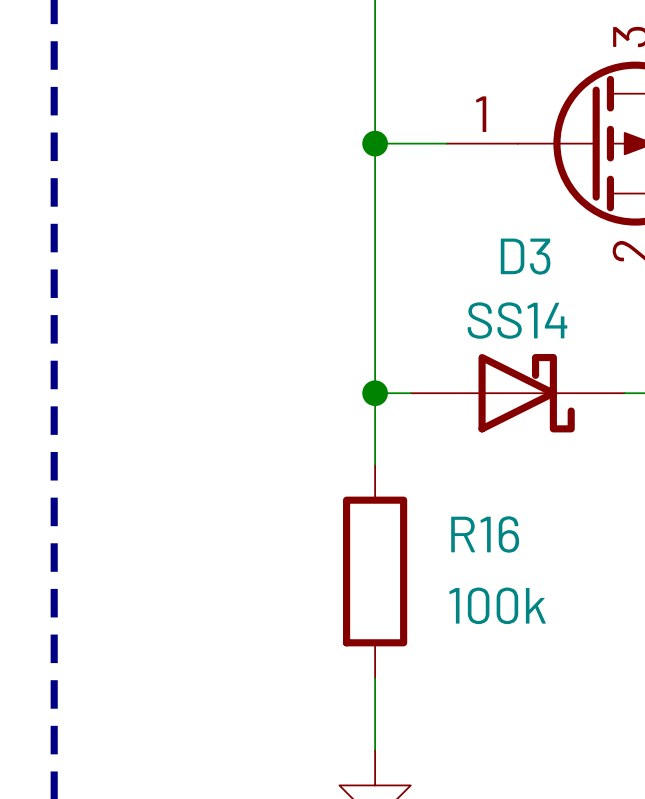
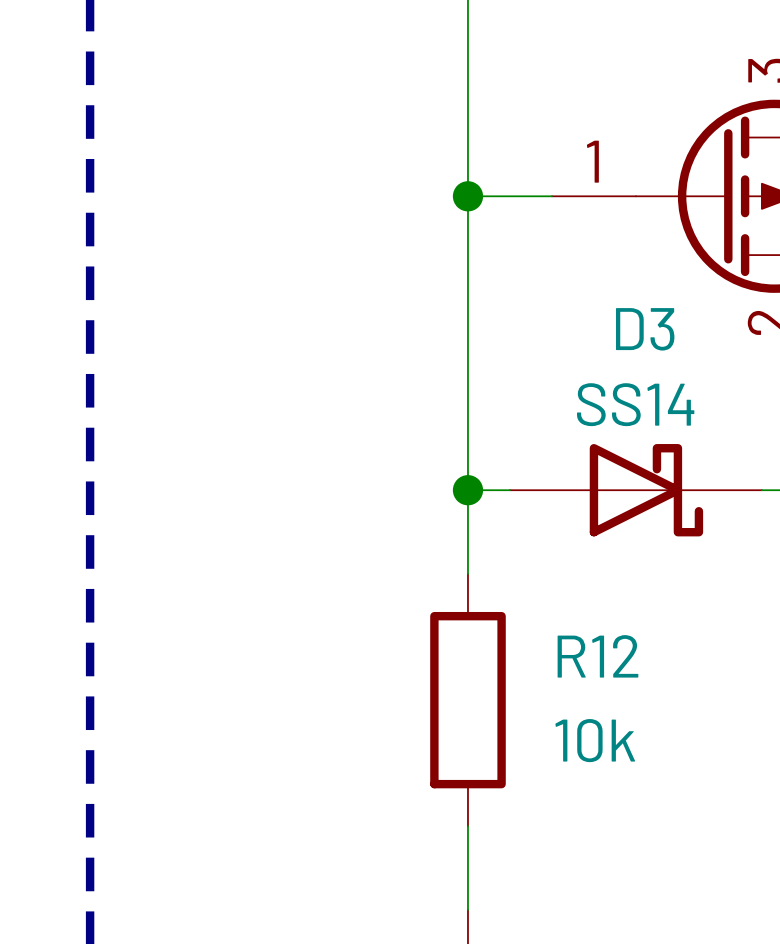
R16 name: R16 (485, 534) -> R12 (597, 656)
R16 value: 100k (497, 605) -> 10k (595, 740)

